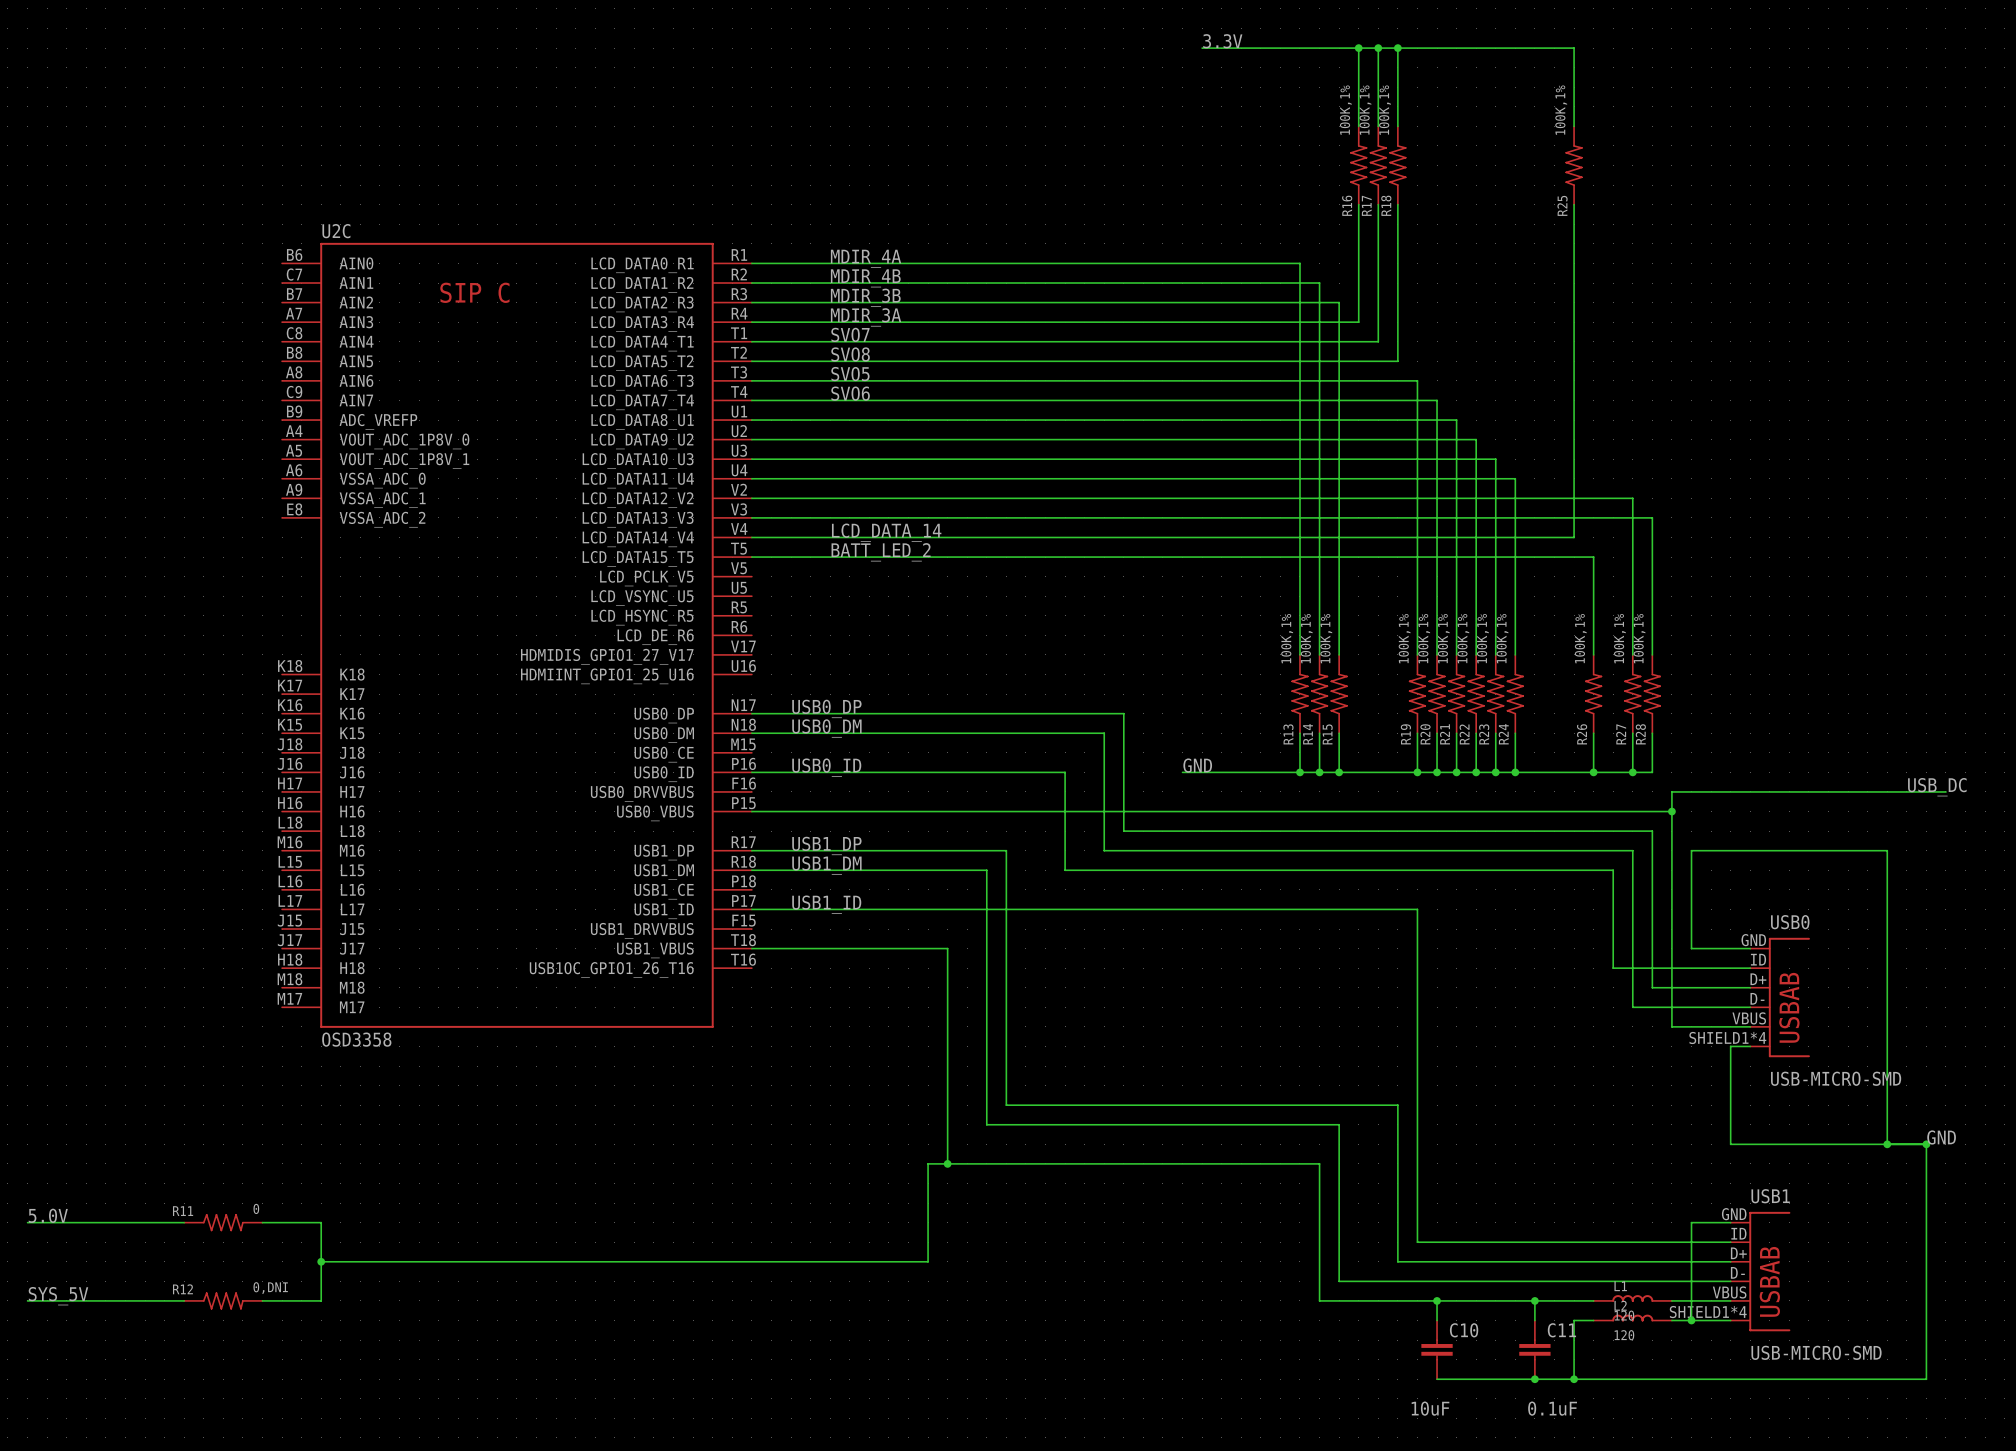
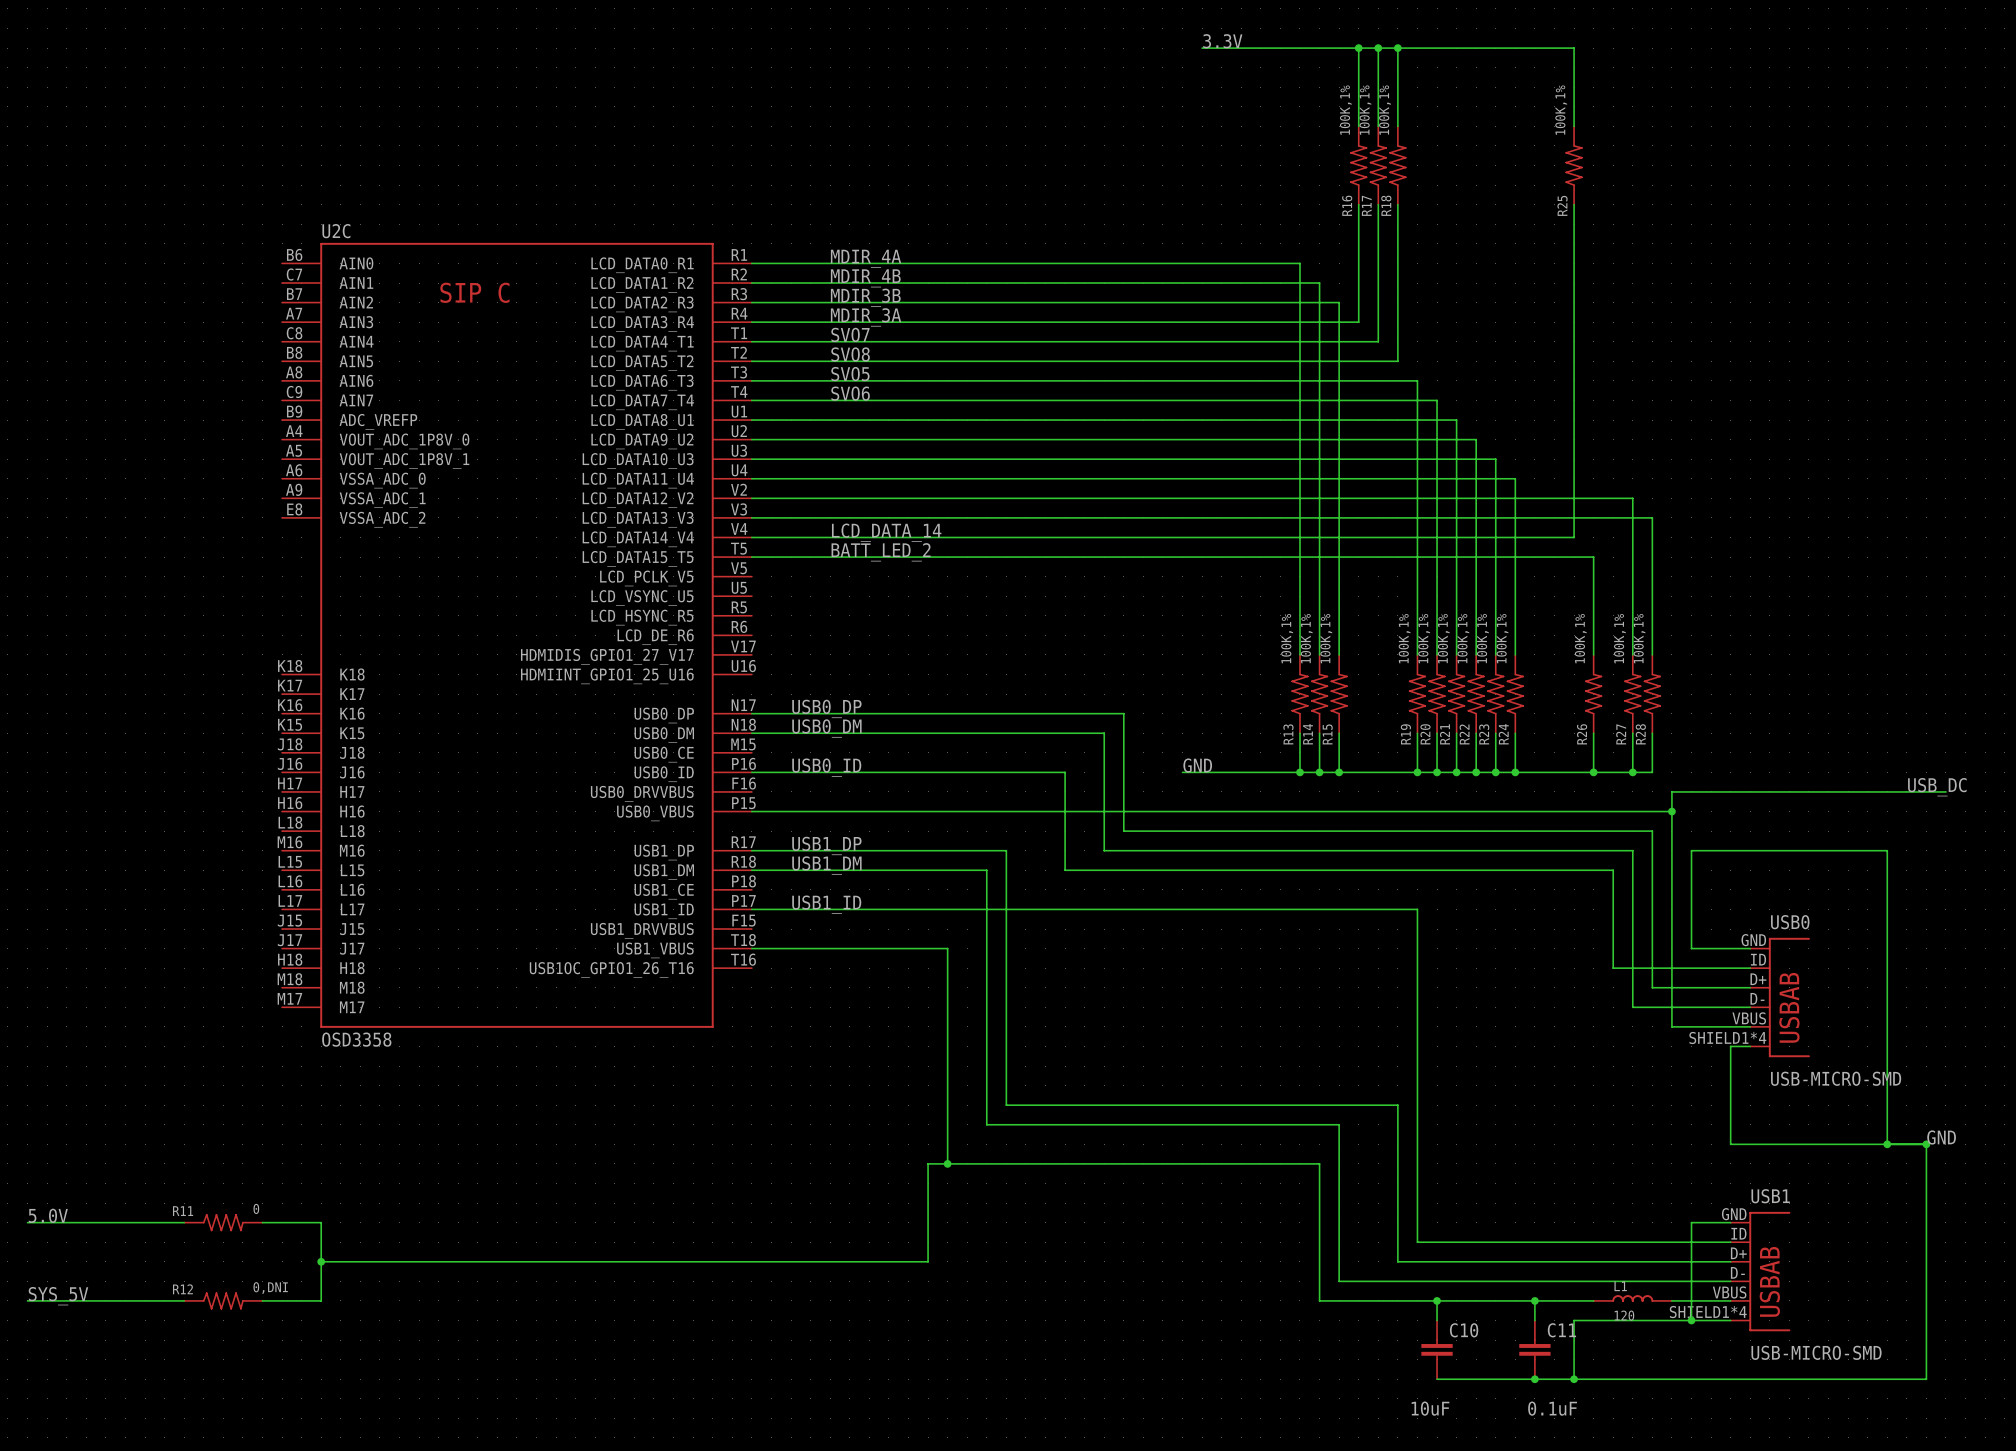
L2: 120 (1632, 1318) -> none

